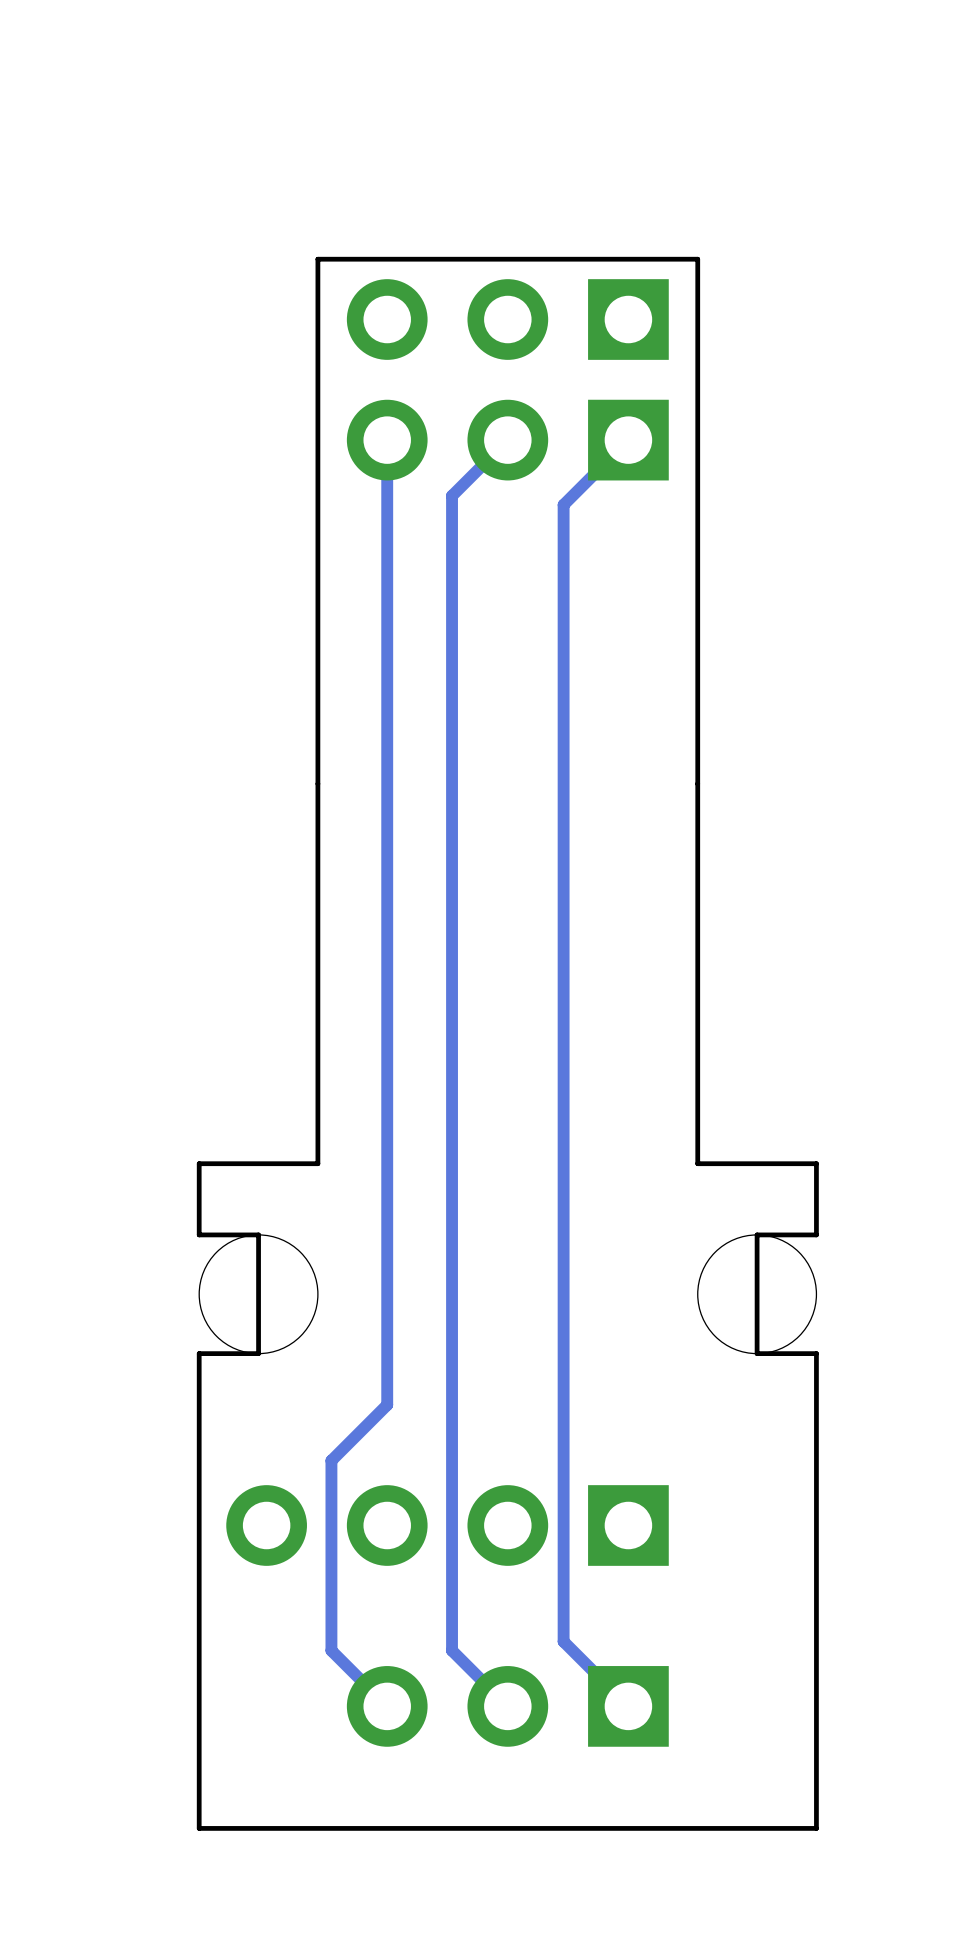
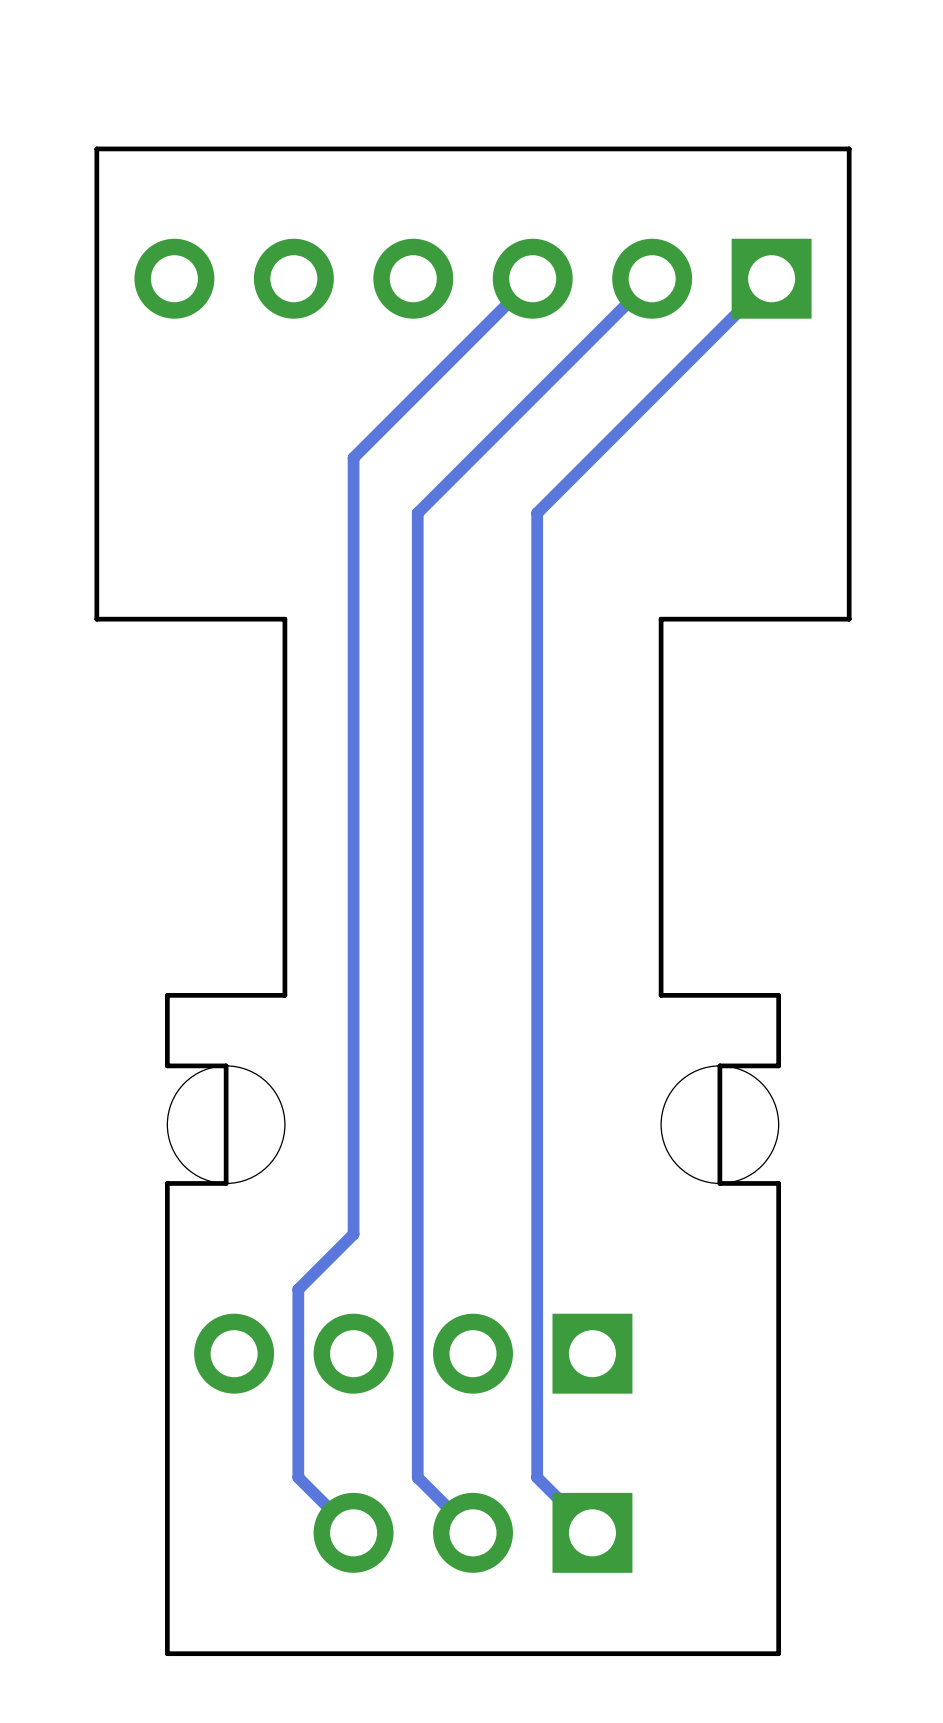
part: (507, 319) -> none
part footprint: [346, 399, 669, 481] -> [134, 238, 812, 319]
track: (387, 440) (387, 621) -> (532, 278) (353, 457)
track: (507, 440) (452, 495) (452, 676) -> (652, 278) (417, 513)
track: (628, 440) (563, 504) (563, 1641) (572, 1650) -> (771, 278) (537, 513) (537, 1477)
board edge: (697, 783) (697, 259) (317, 259) (317, 783) -> (661, 619) (849, 619) (849, 148) (96, 148) (96, 619) (284, 619)

